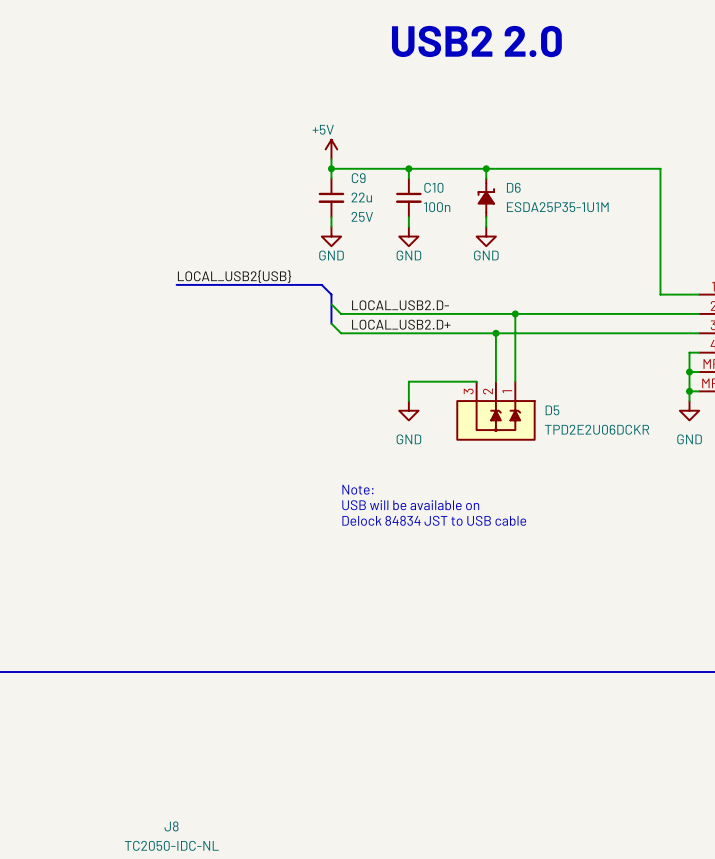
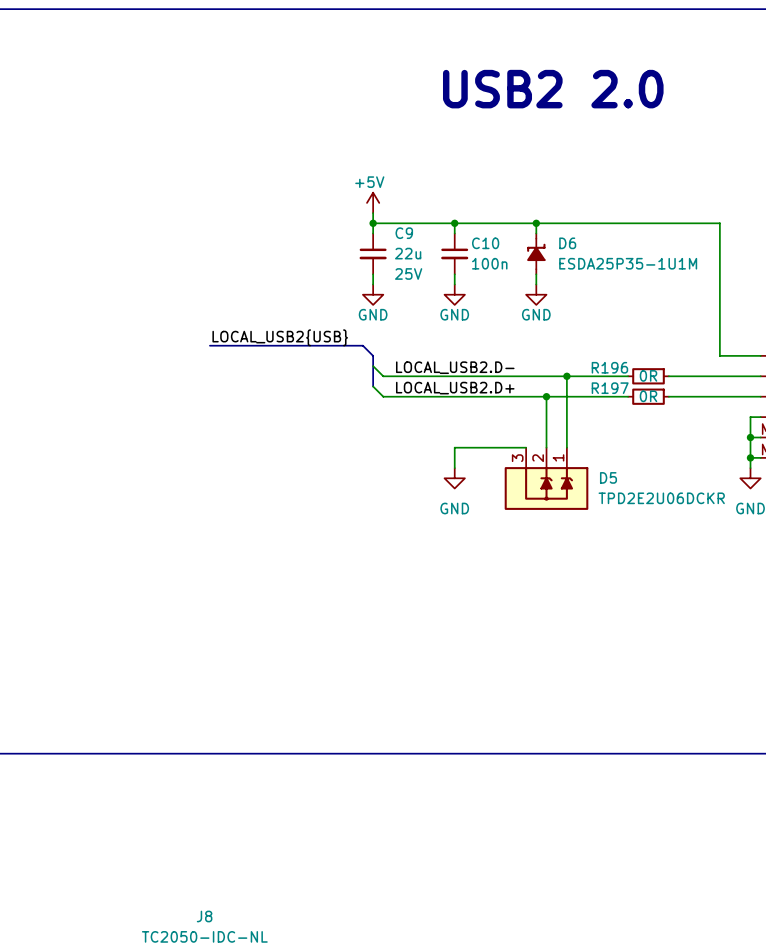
wire: (573, 313) (612, 313) -> none
R196: none -> (648, 376)
wire: (573, 333) (612, 333) -> none
R197: none -> (648, 396)
text: Note: (357, 489) -> none
text: USB will be available on (410, 505) -> none
text: Delock 84834 JST to USB cable (434, 520) -> none

